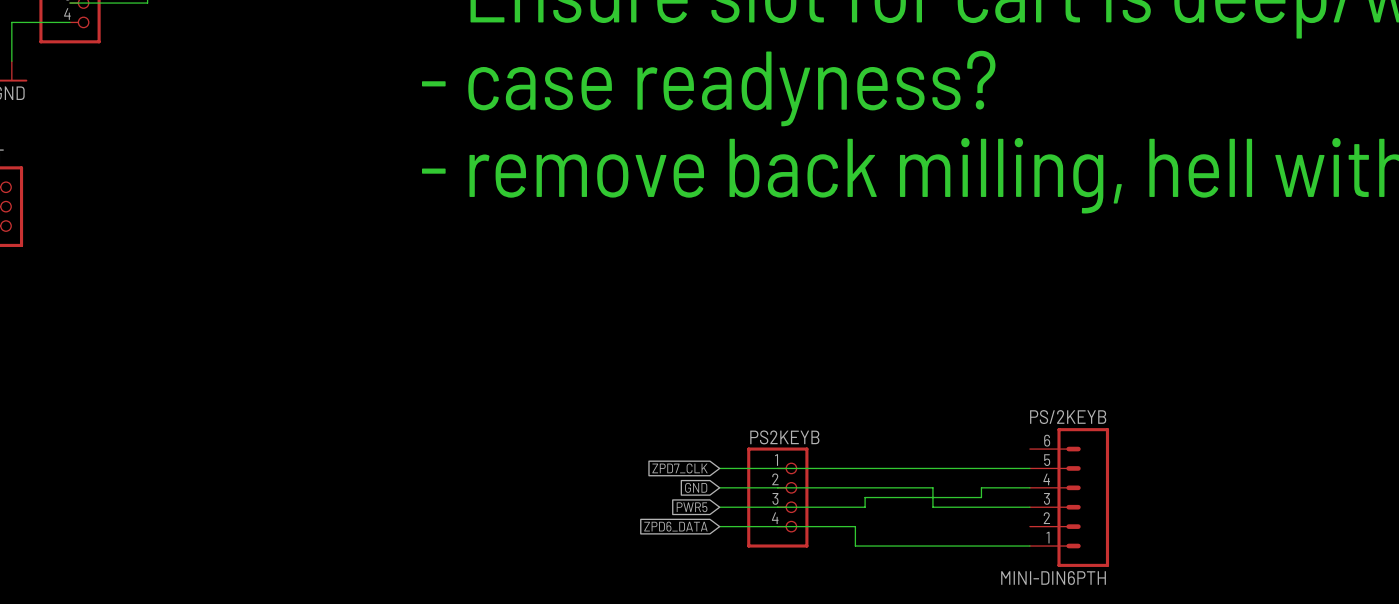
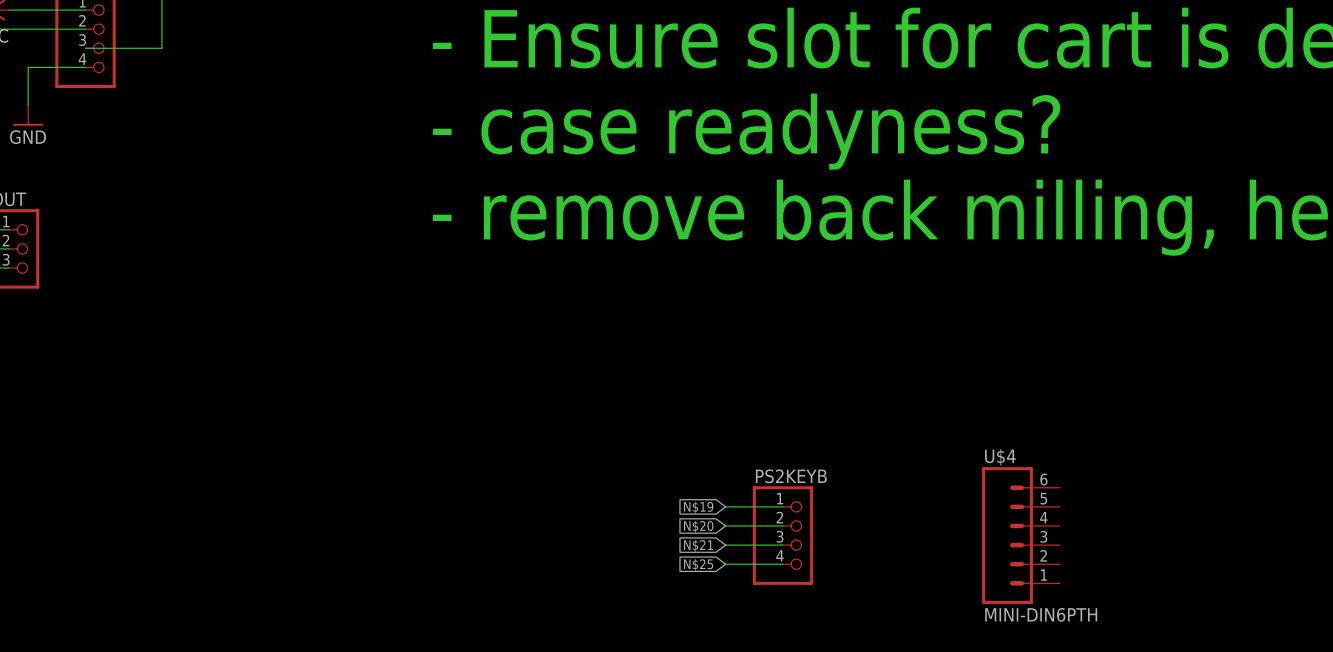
global label: ZPD7_CLK (680, 468) -> N$19 (698, 507)
wire: (777, 468) (1029, 468) -> none
global label: GND (696, 487) -> N$20 (698, 526)
wire: (777, 487) (932, 487) (932, 507) (1029, 507) -> none
wire: (1029, 487) (981, 487) (981, 497) (865, 497) (865, 507) (777, 507) -> none
U$4: none -> MINI-DIN6PTH (1021, 535)
PS/2KEYB: MINI-DIN6PTH (1069, 497) -> none
global label: PWR5 (692, 507) -> N$21 (698, 545)
global label: ZPD6_DATA (675, 526) -> N$25 (698, 564)
wire: (777, 526) (855, 526) (855, 546) (1029, 546) -> none

